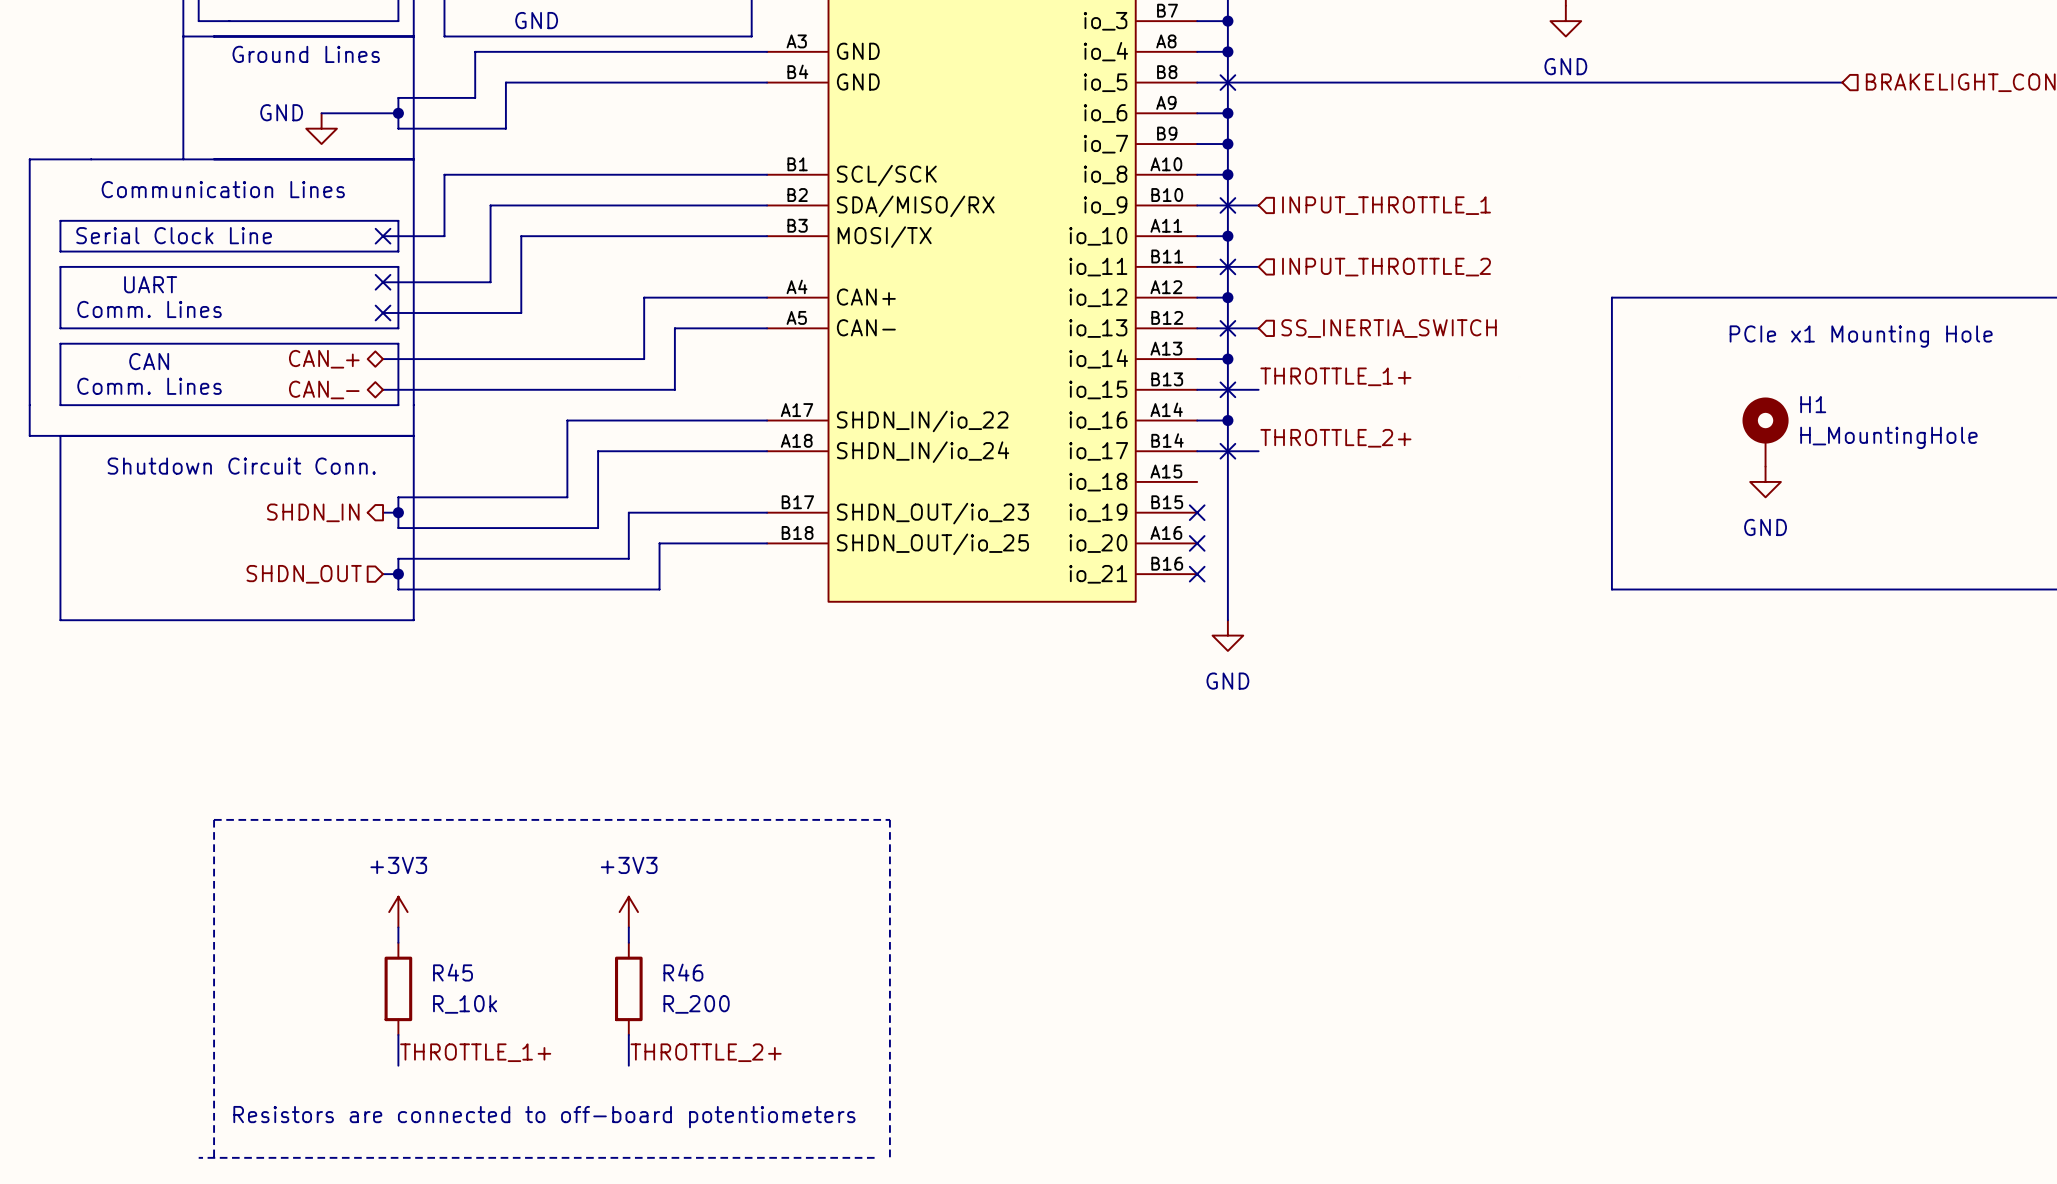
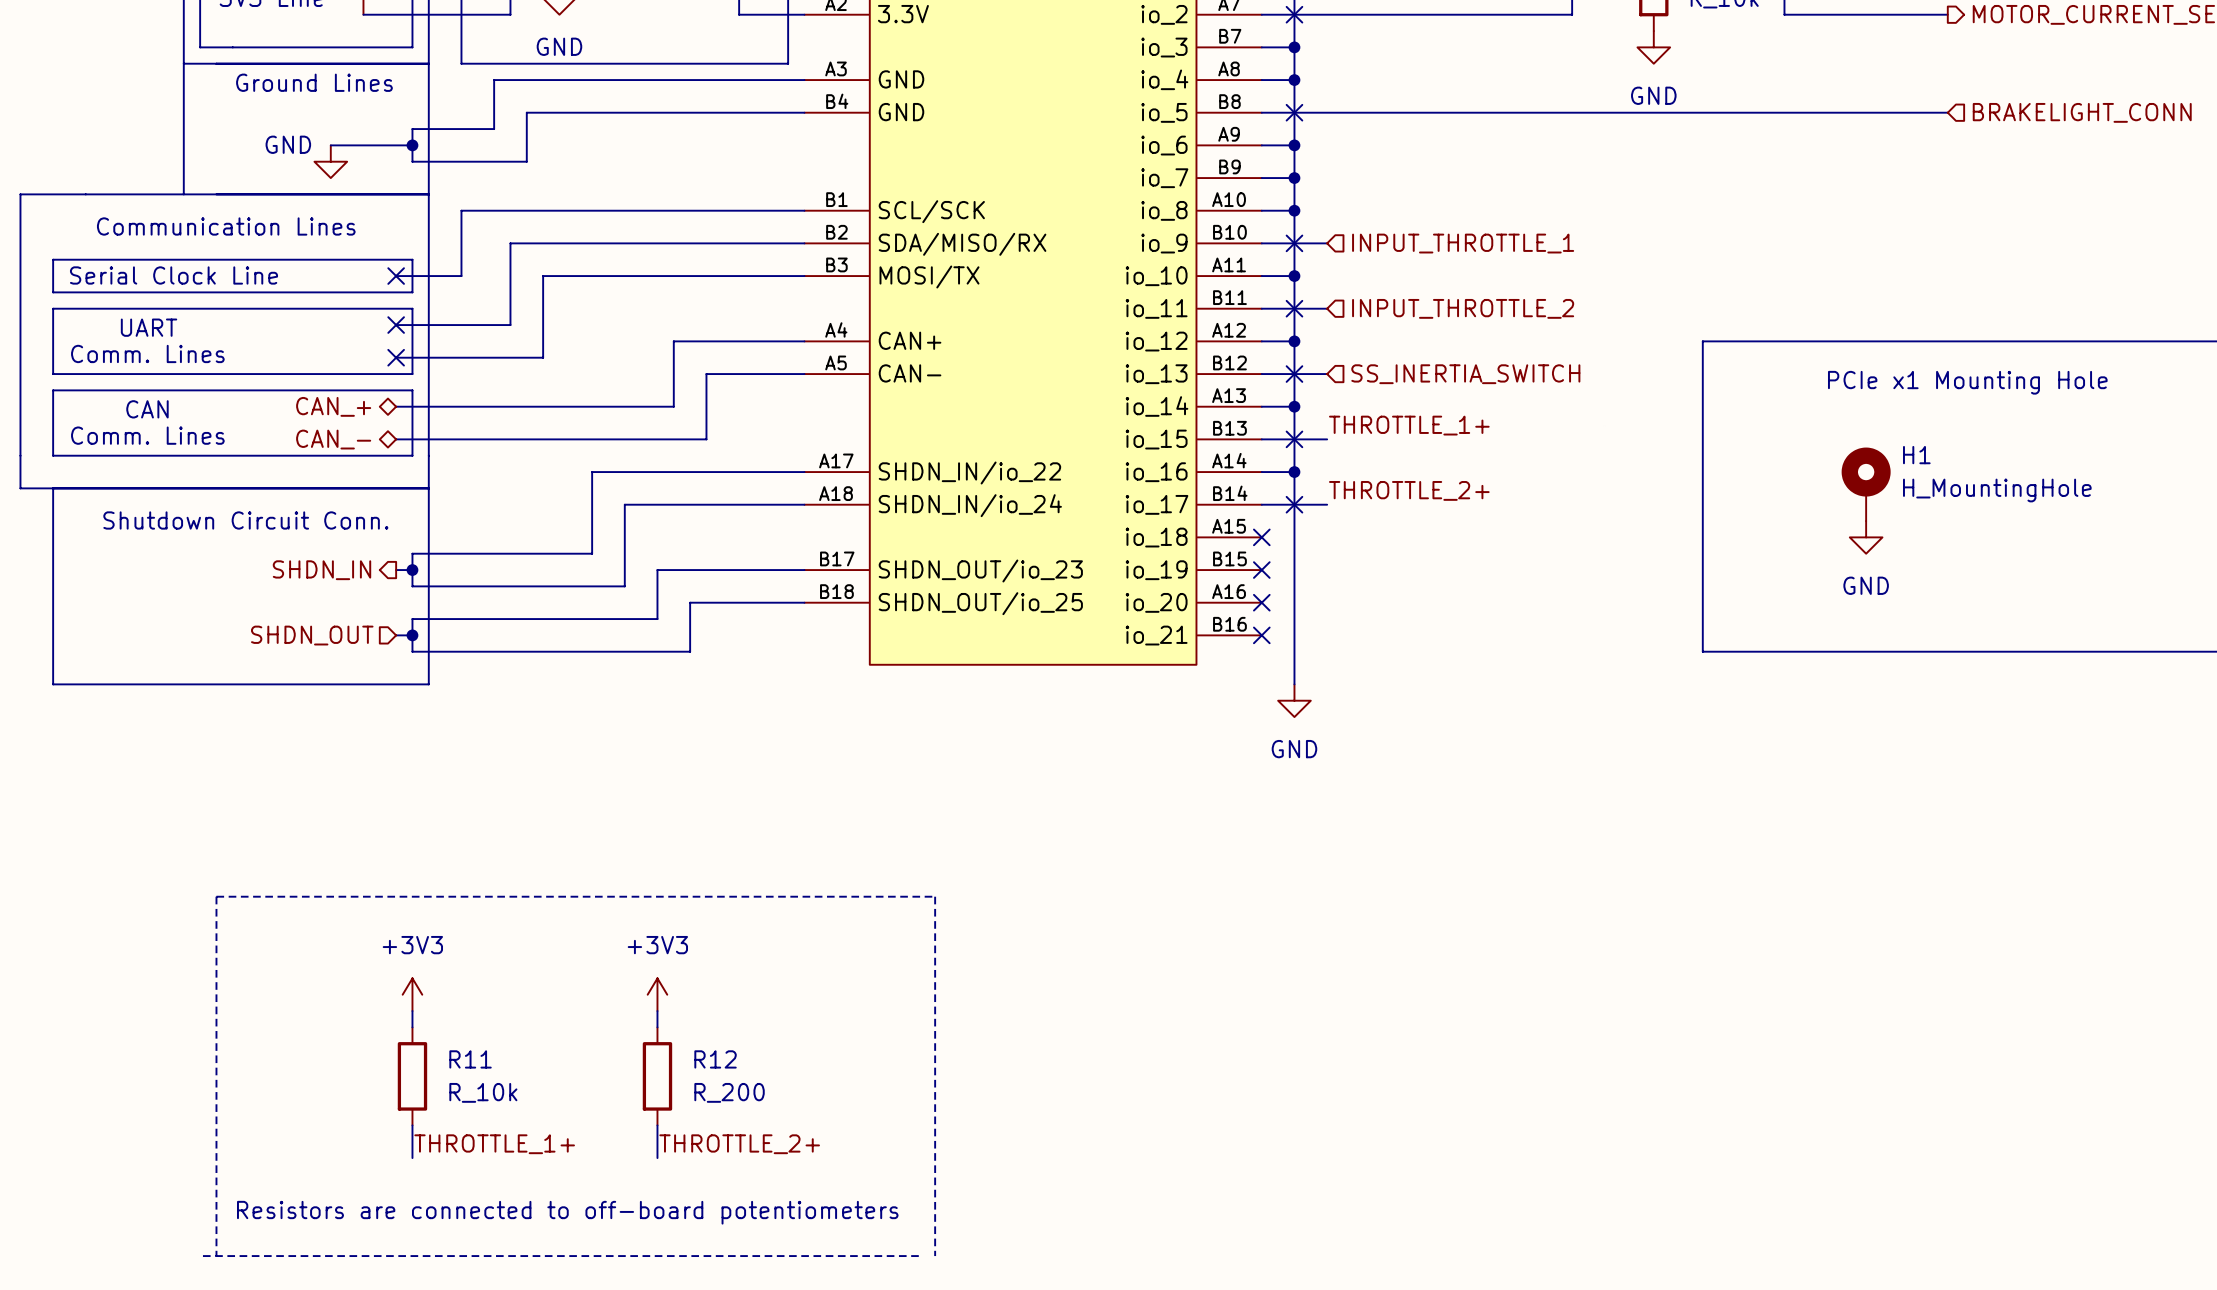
no-connect mark: none -> (1261, 537)
R45 name: R45 (453, 972) -> R11 (470, 1059)
R46 name: R46 (683, 972) -> R12 (715, 1059)

